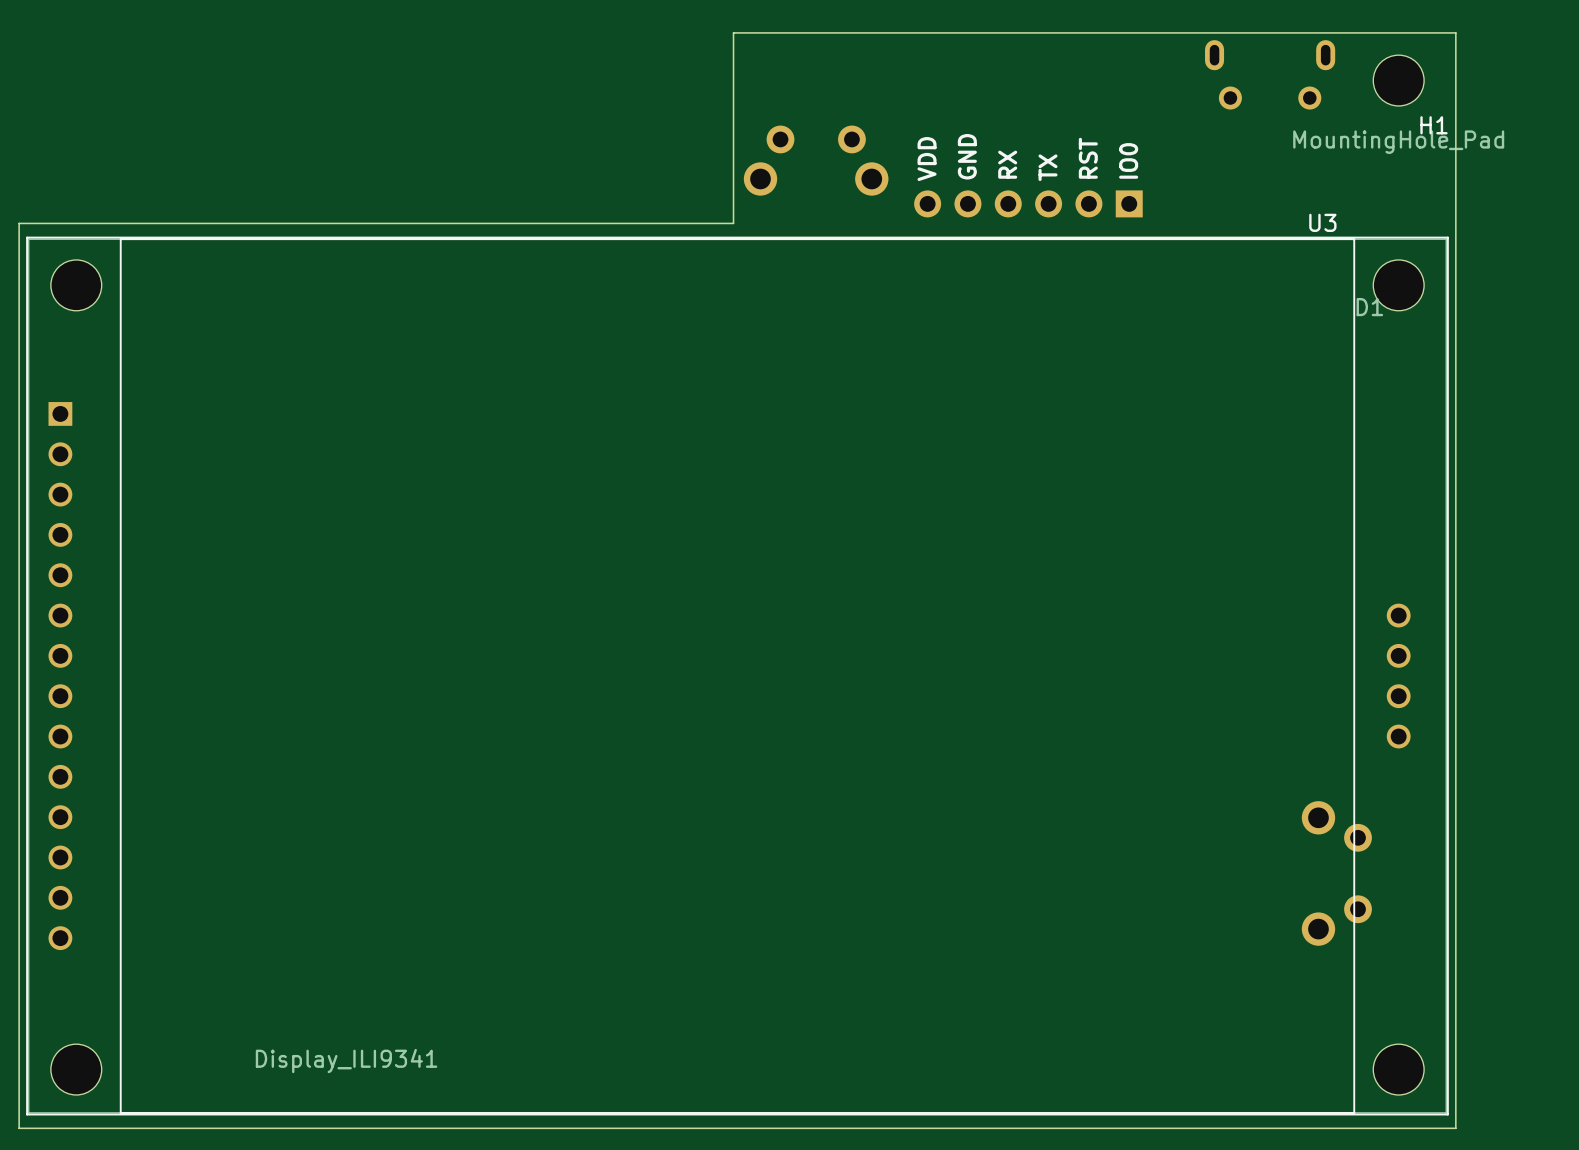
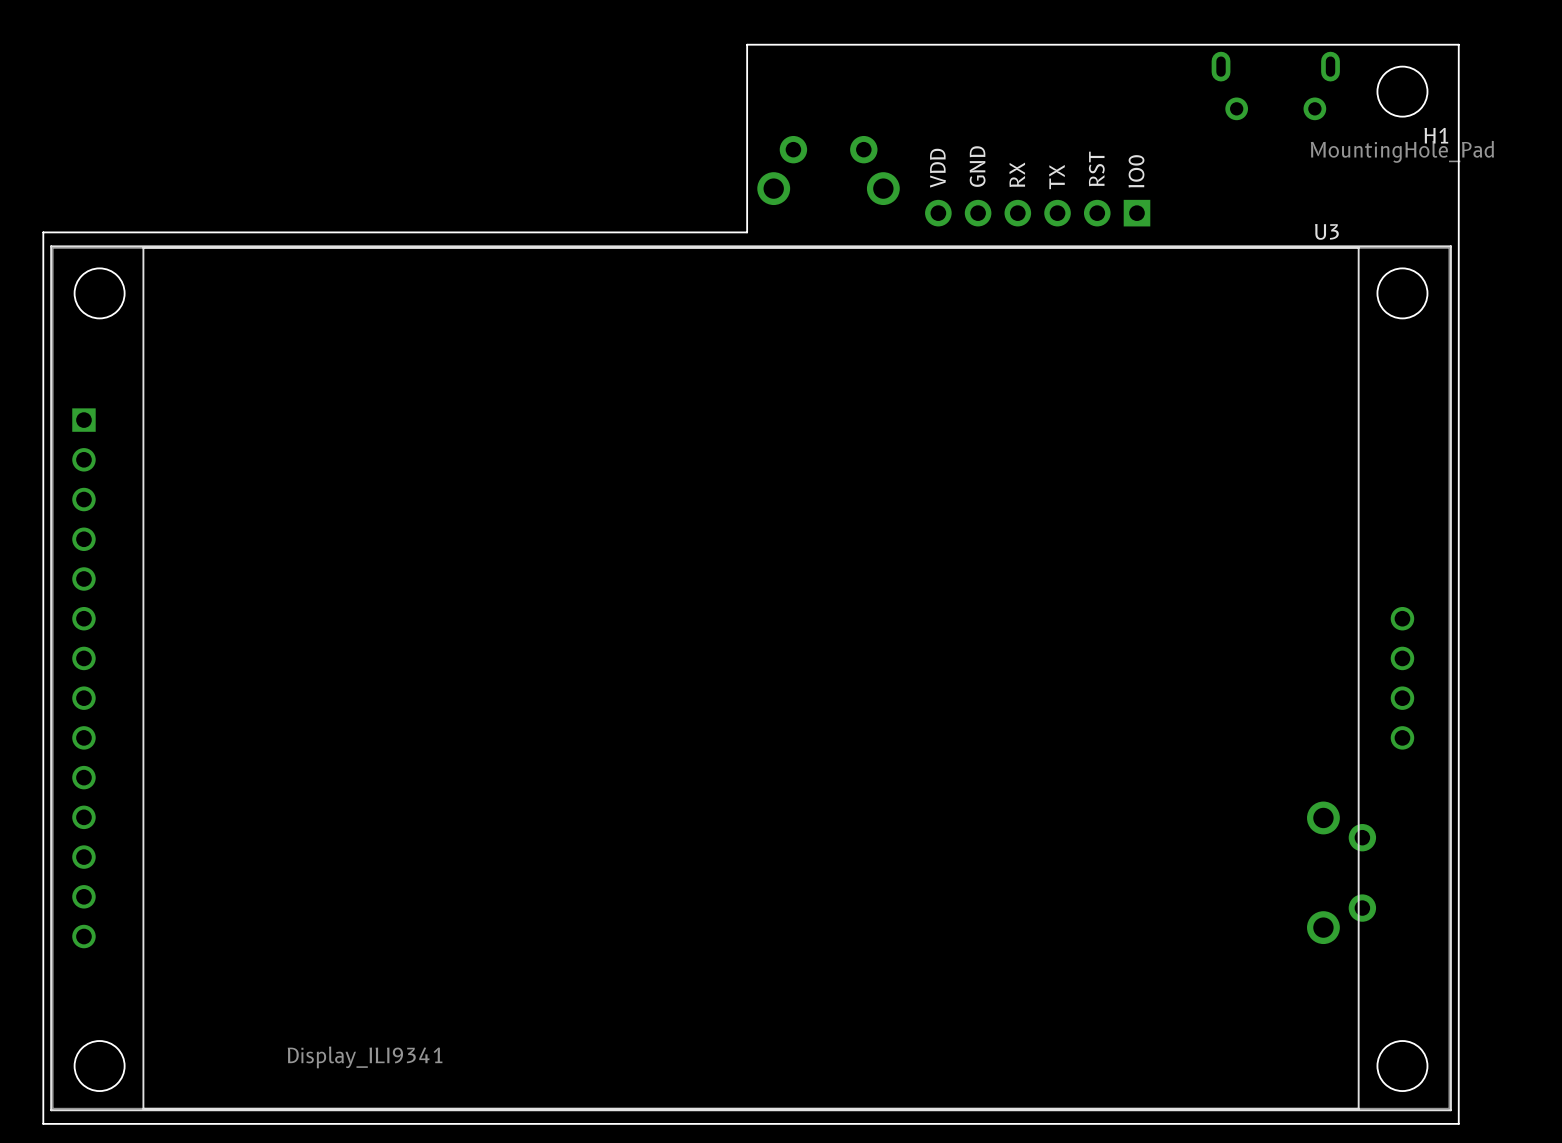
D1: (1369, 307) -> none

